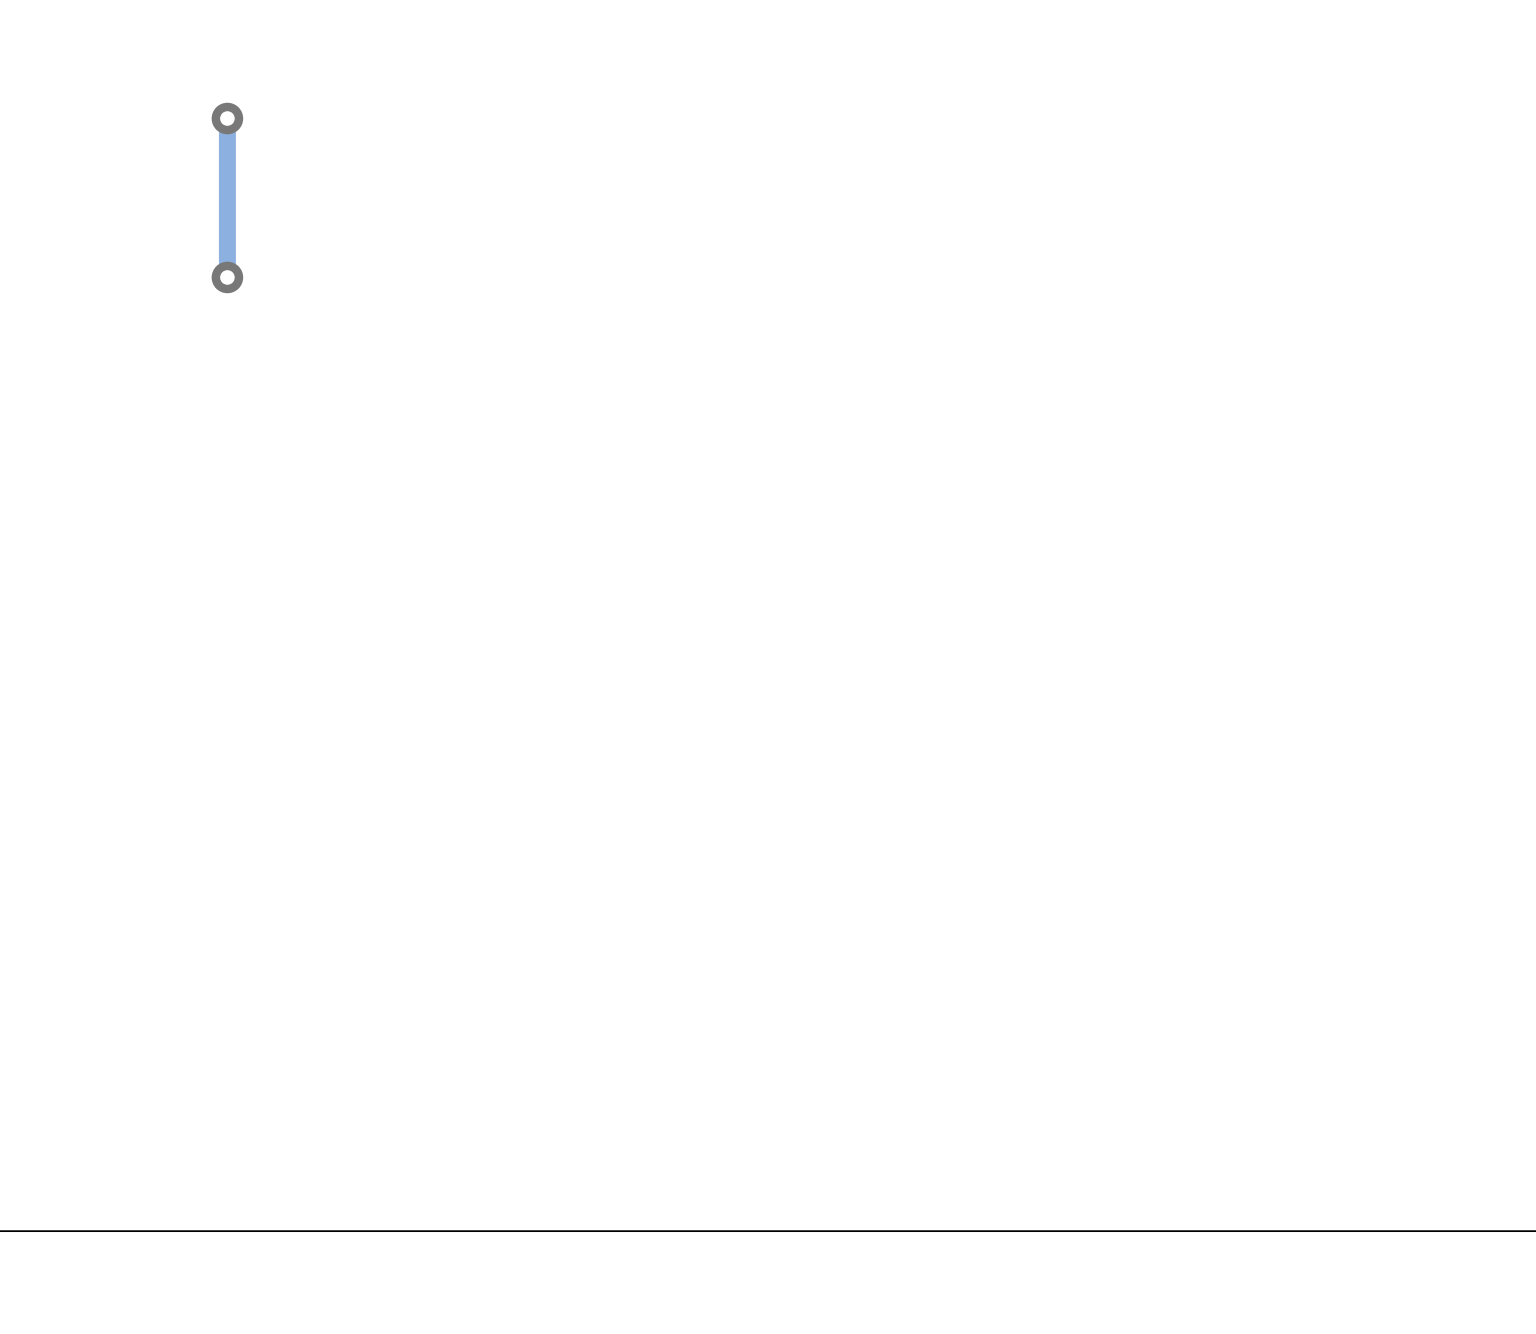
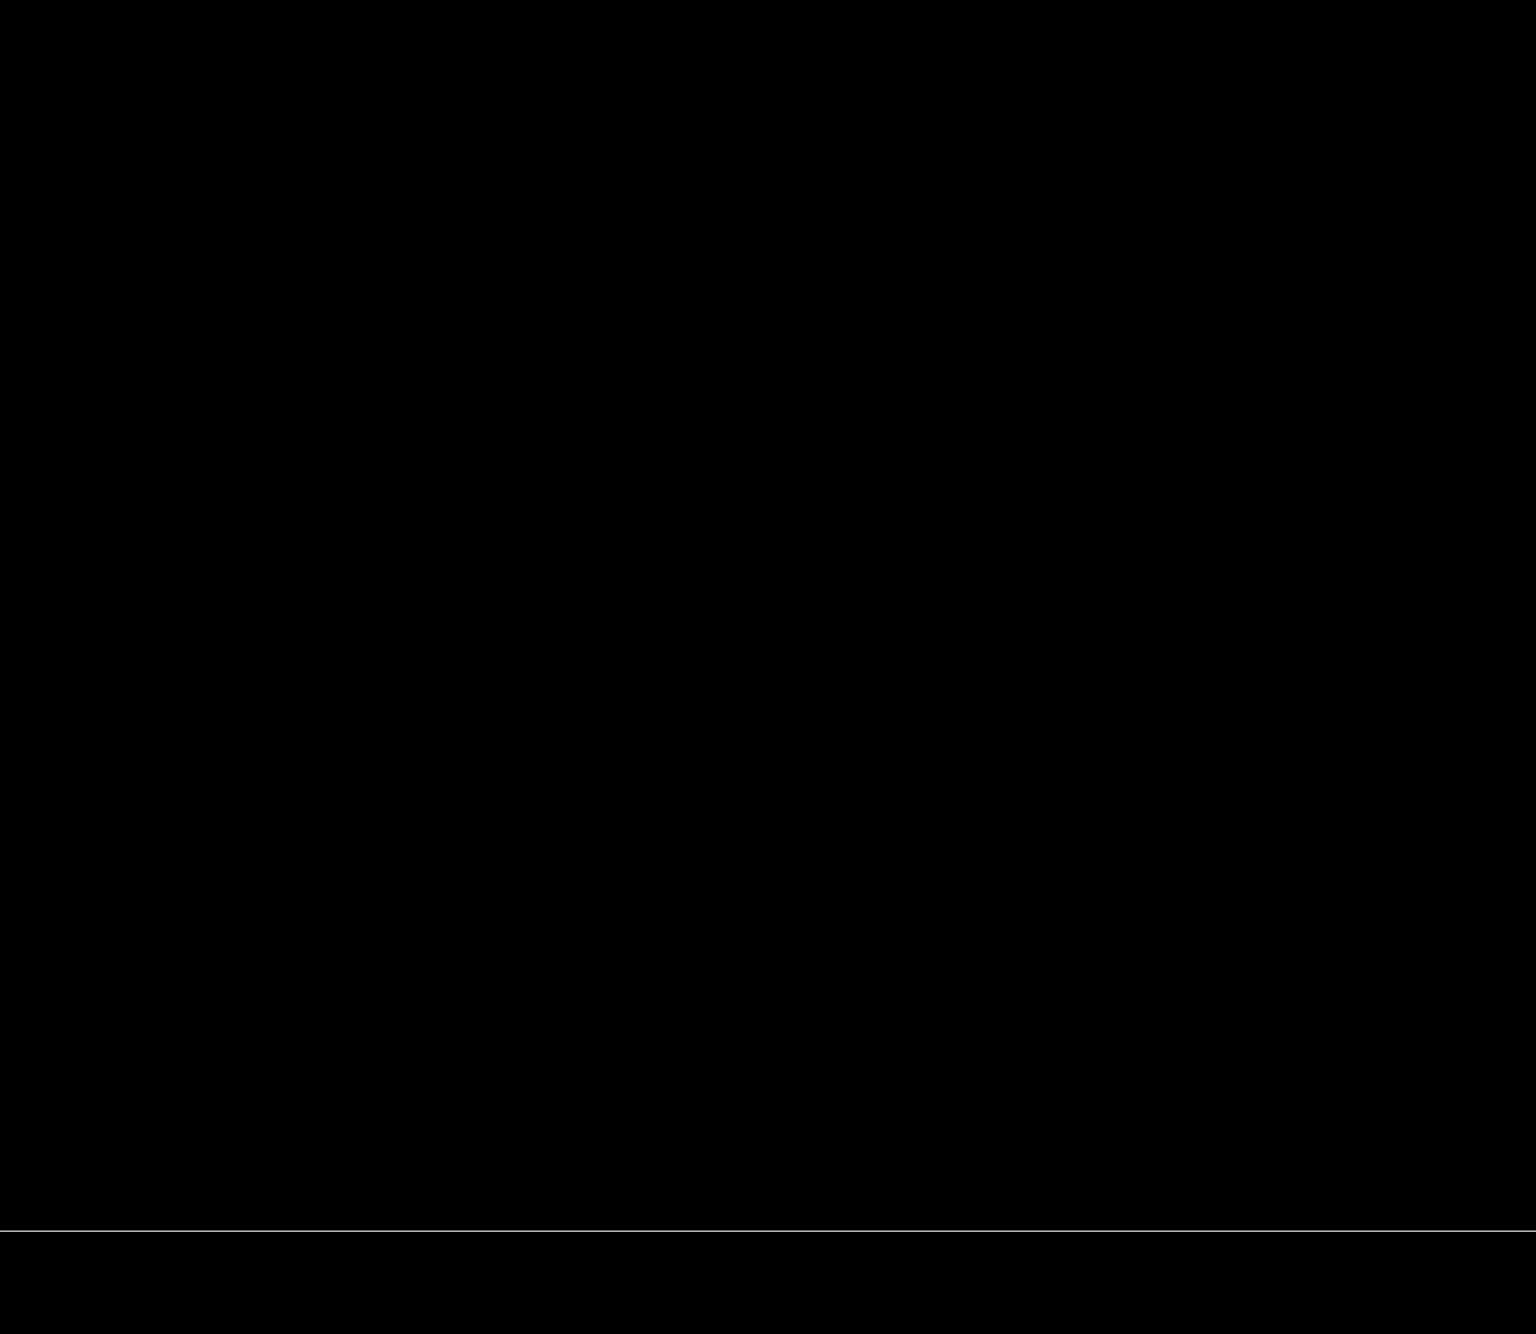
track: (227, 118) (227, 277) -> none
via: (227, 118) -> none
via: (227, 277) -> none

